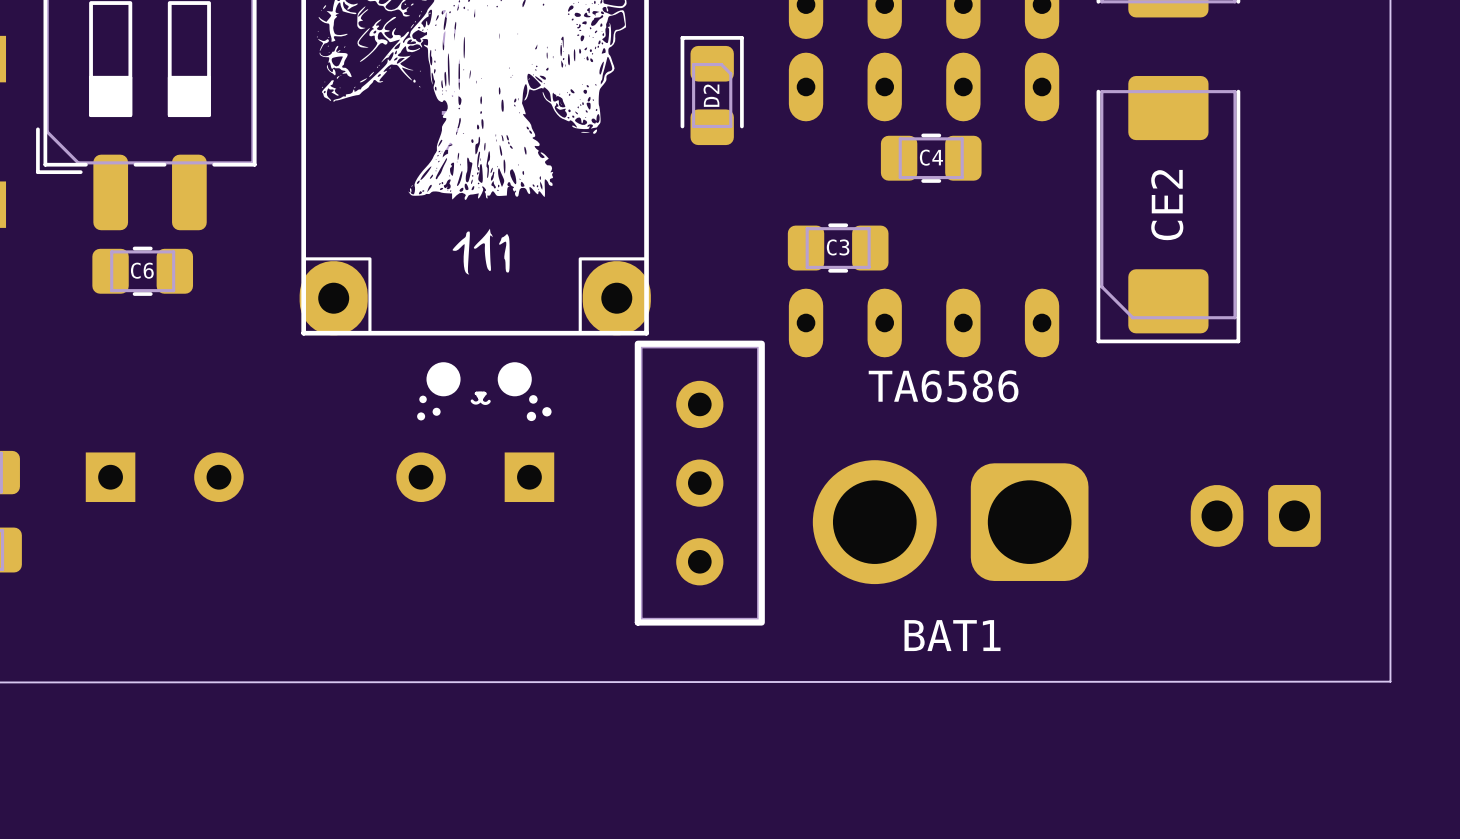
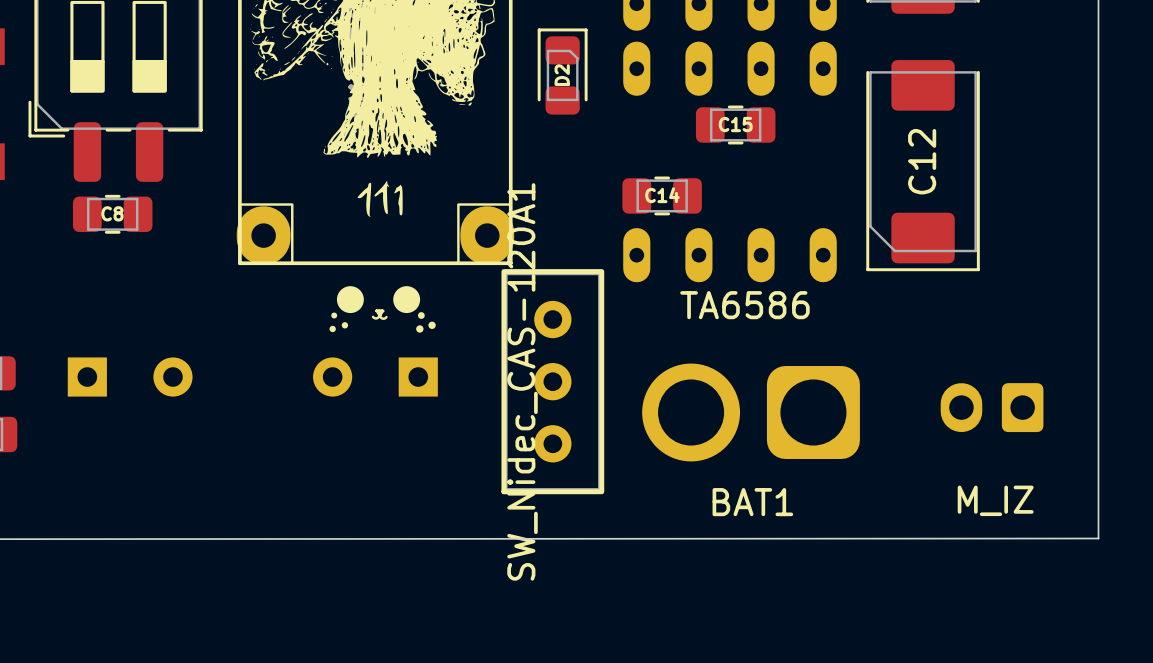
C4 name: C4 (931, 157) -> C15 (735, 124)
CE2 name: CE2 (1167, 205) -> C12 (922, 161)
C3 name: C3 (838, 247) -> C14 (662, 195)
C6 name: C6 (142, 270) -> C8 (112, 213)
part value: none -> SW_Nidec_CAS-120A1 (522, 381)
part value: none -> M_IZ (995, 500)

